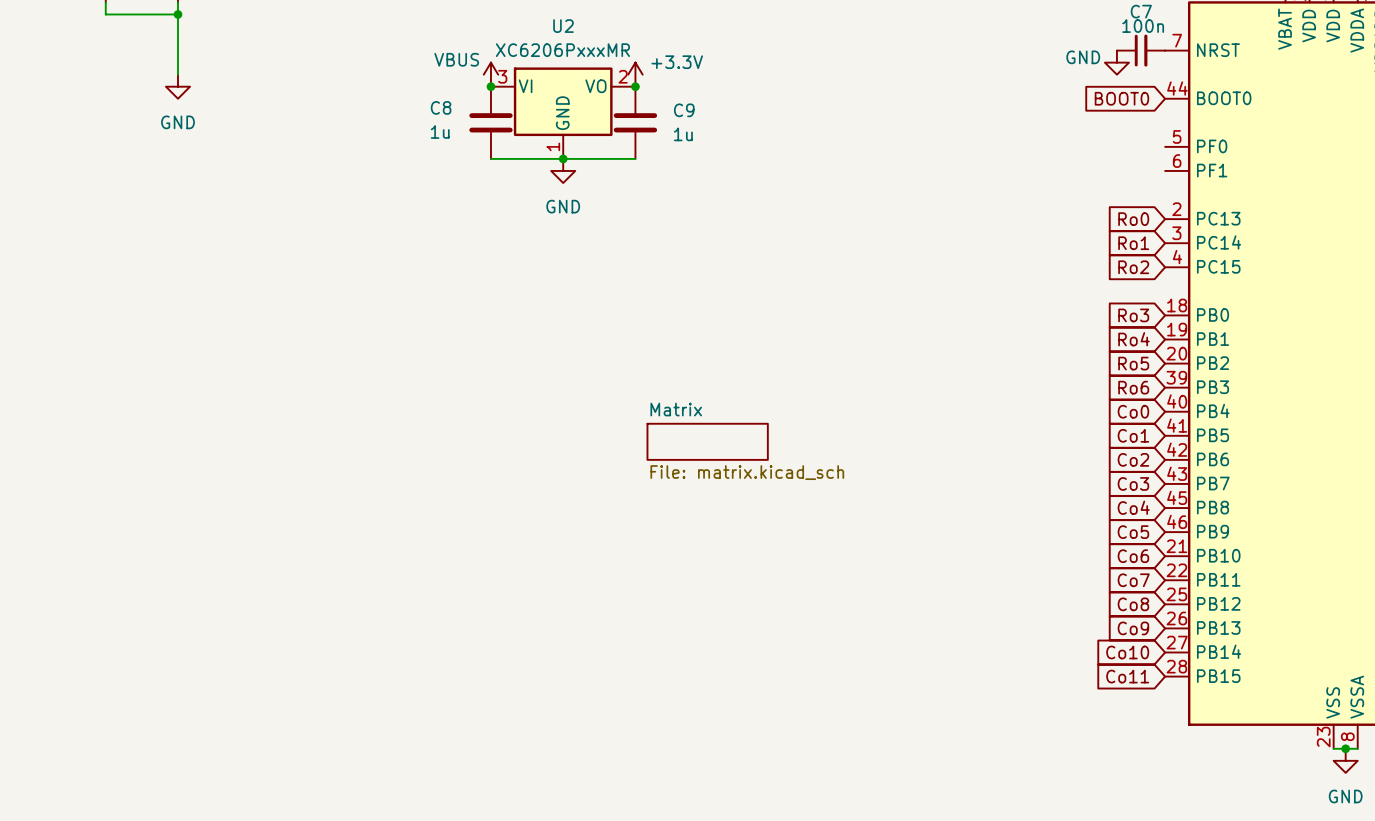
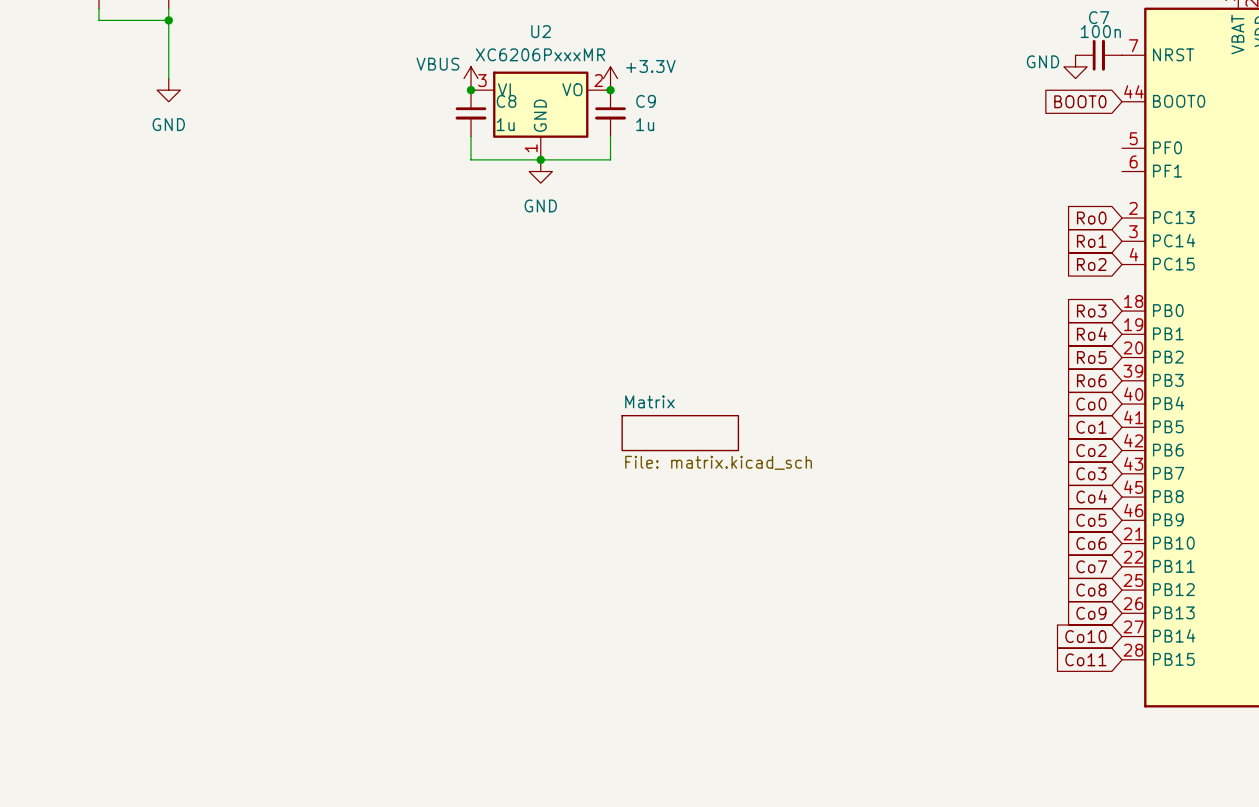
C8 symbol: [469, 86, 513, 159] -> [455, 90, 487, 137]
C9 symbol: [613, 86, 658, 159] -> [595, 90, 626, 137]
C8 name position: C8 (441, 107) -> C8 (506, 101)
C8 value position: 1u (440, 132) -> 1u (505, 124)

